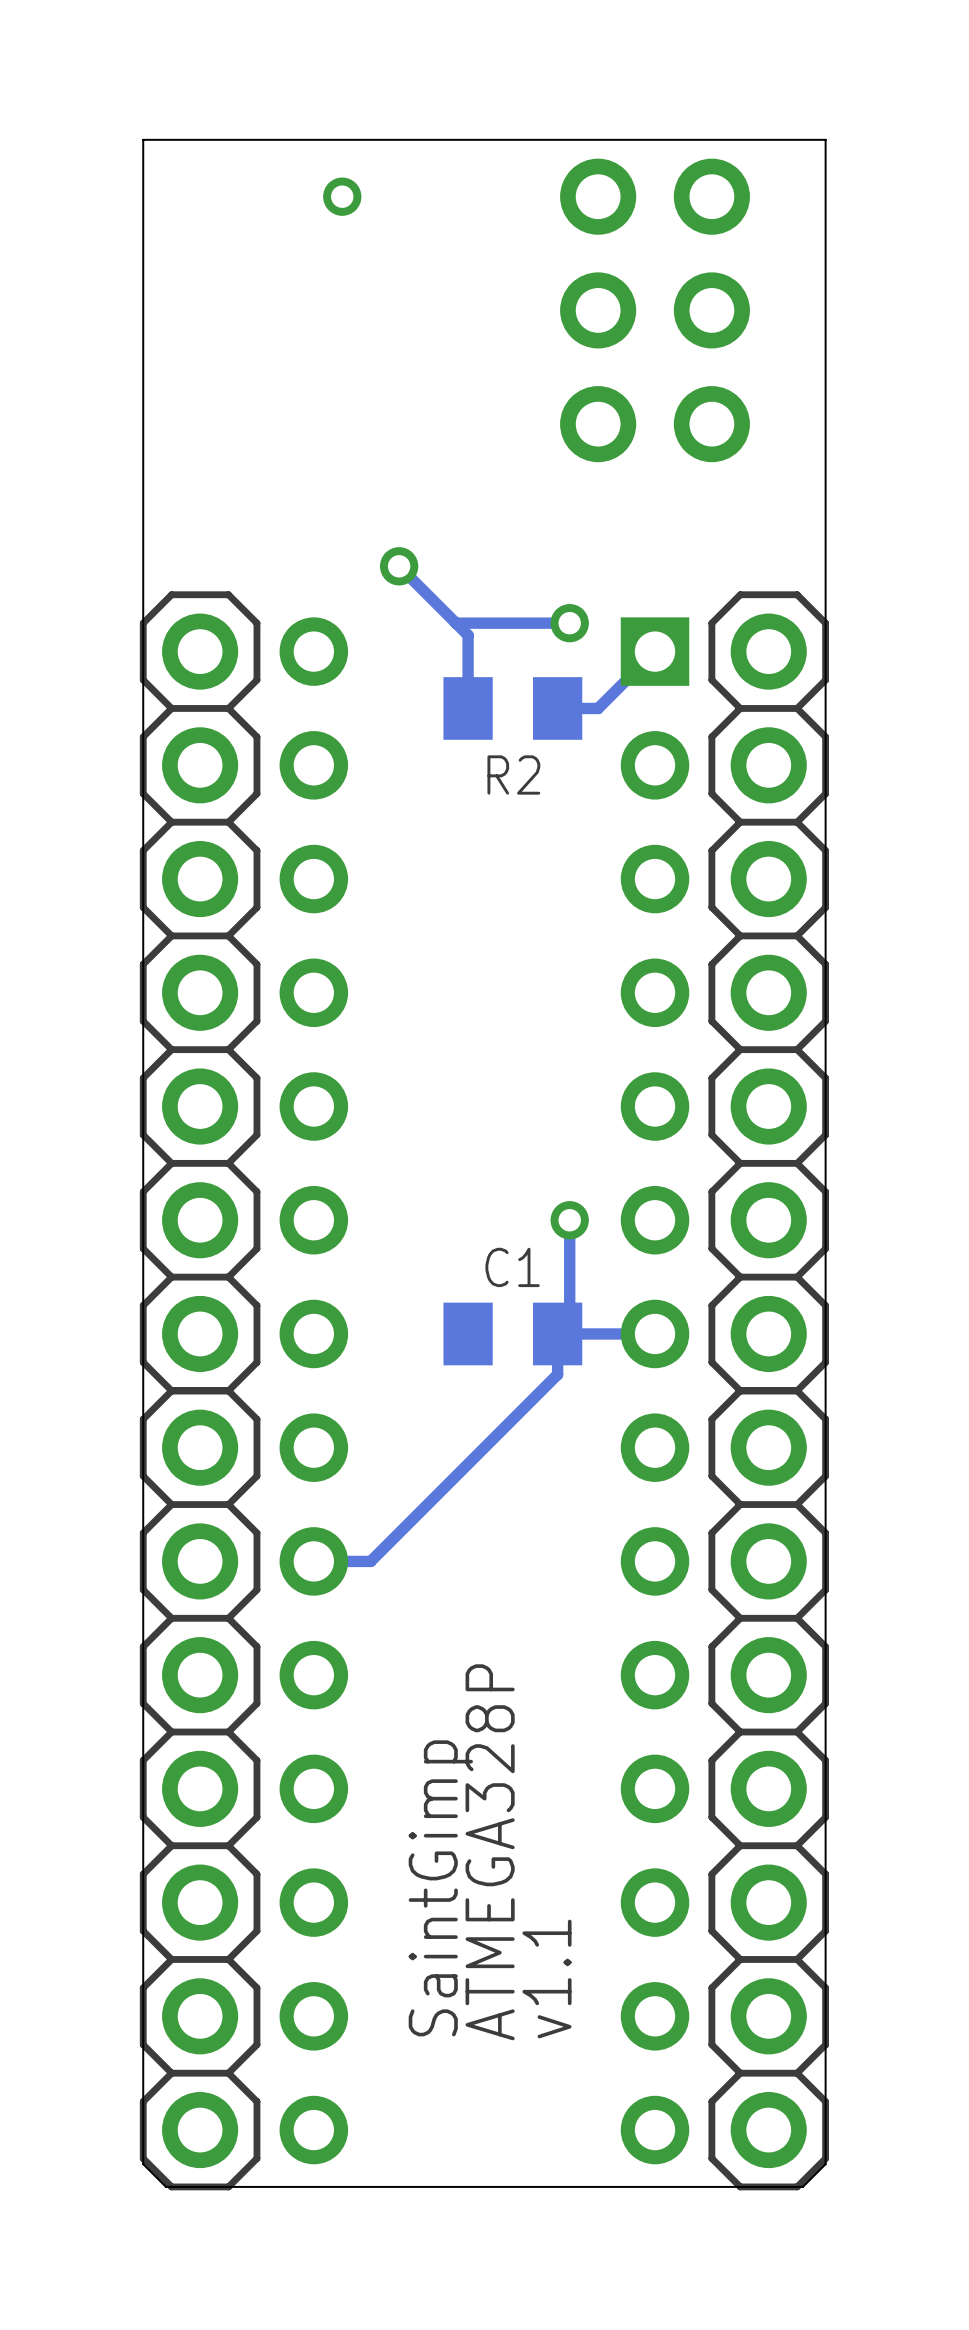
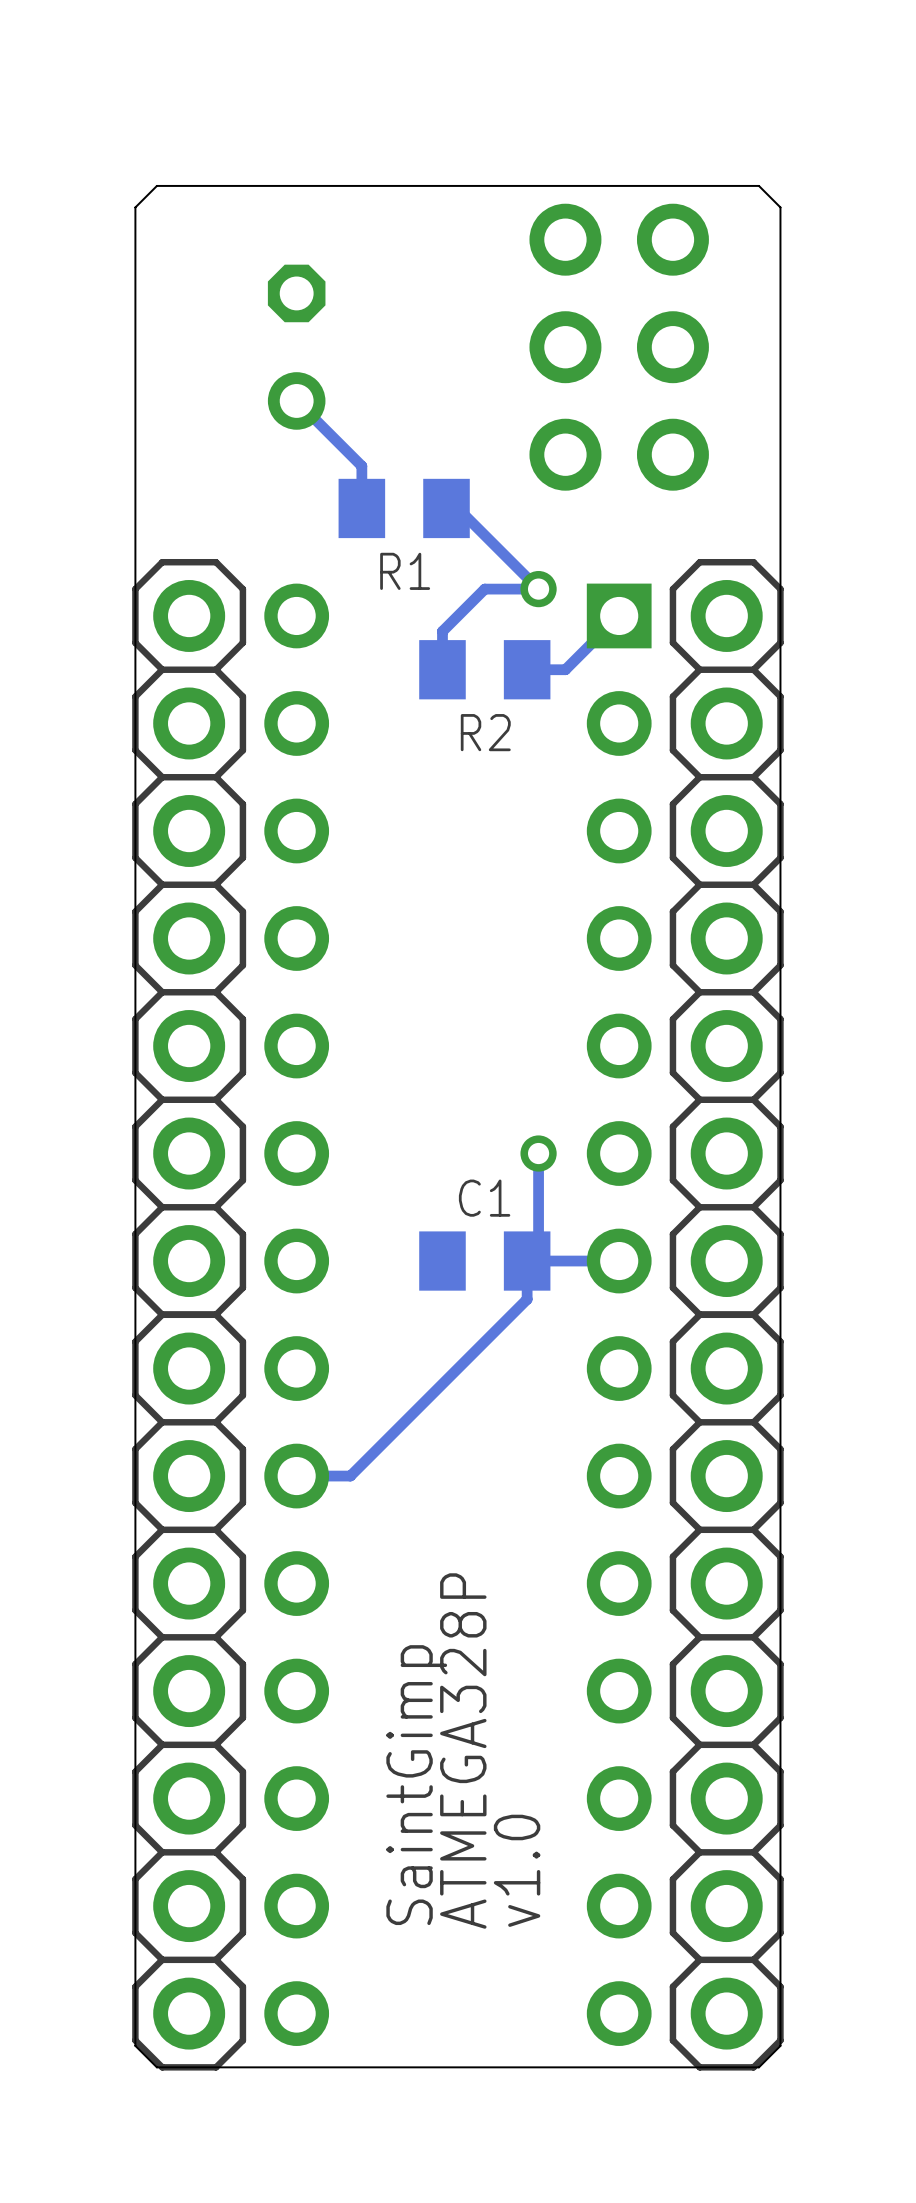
via: (342, 196) -> none
board edge: (825, 219) (825, 139) (143, 139) (143, 219) -> (780, 207) (758, 185) (156, 185) (135, 207)
part position: (655, 310) -> (619, 347)
part: none -> (296, 347)
track: none -> (296, 400) (361, 466) (361, 508)
R1: none -> (404, 508)
track: none -> (446, 508) (457, 508) (538, 589)
track: (399, 566) (468, 635) (468, 667) -> none
via: (399, 566) -> none
track: (512, 623) (455, 623) -> (484, 589) (442, 631)
text: v1.1 (546, 1979) -> v1.0 (517, 1870)

